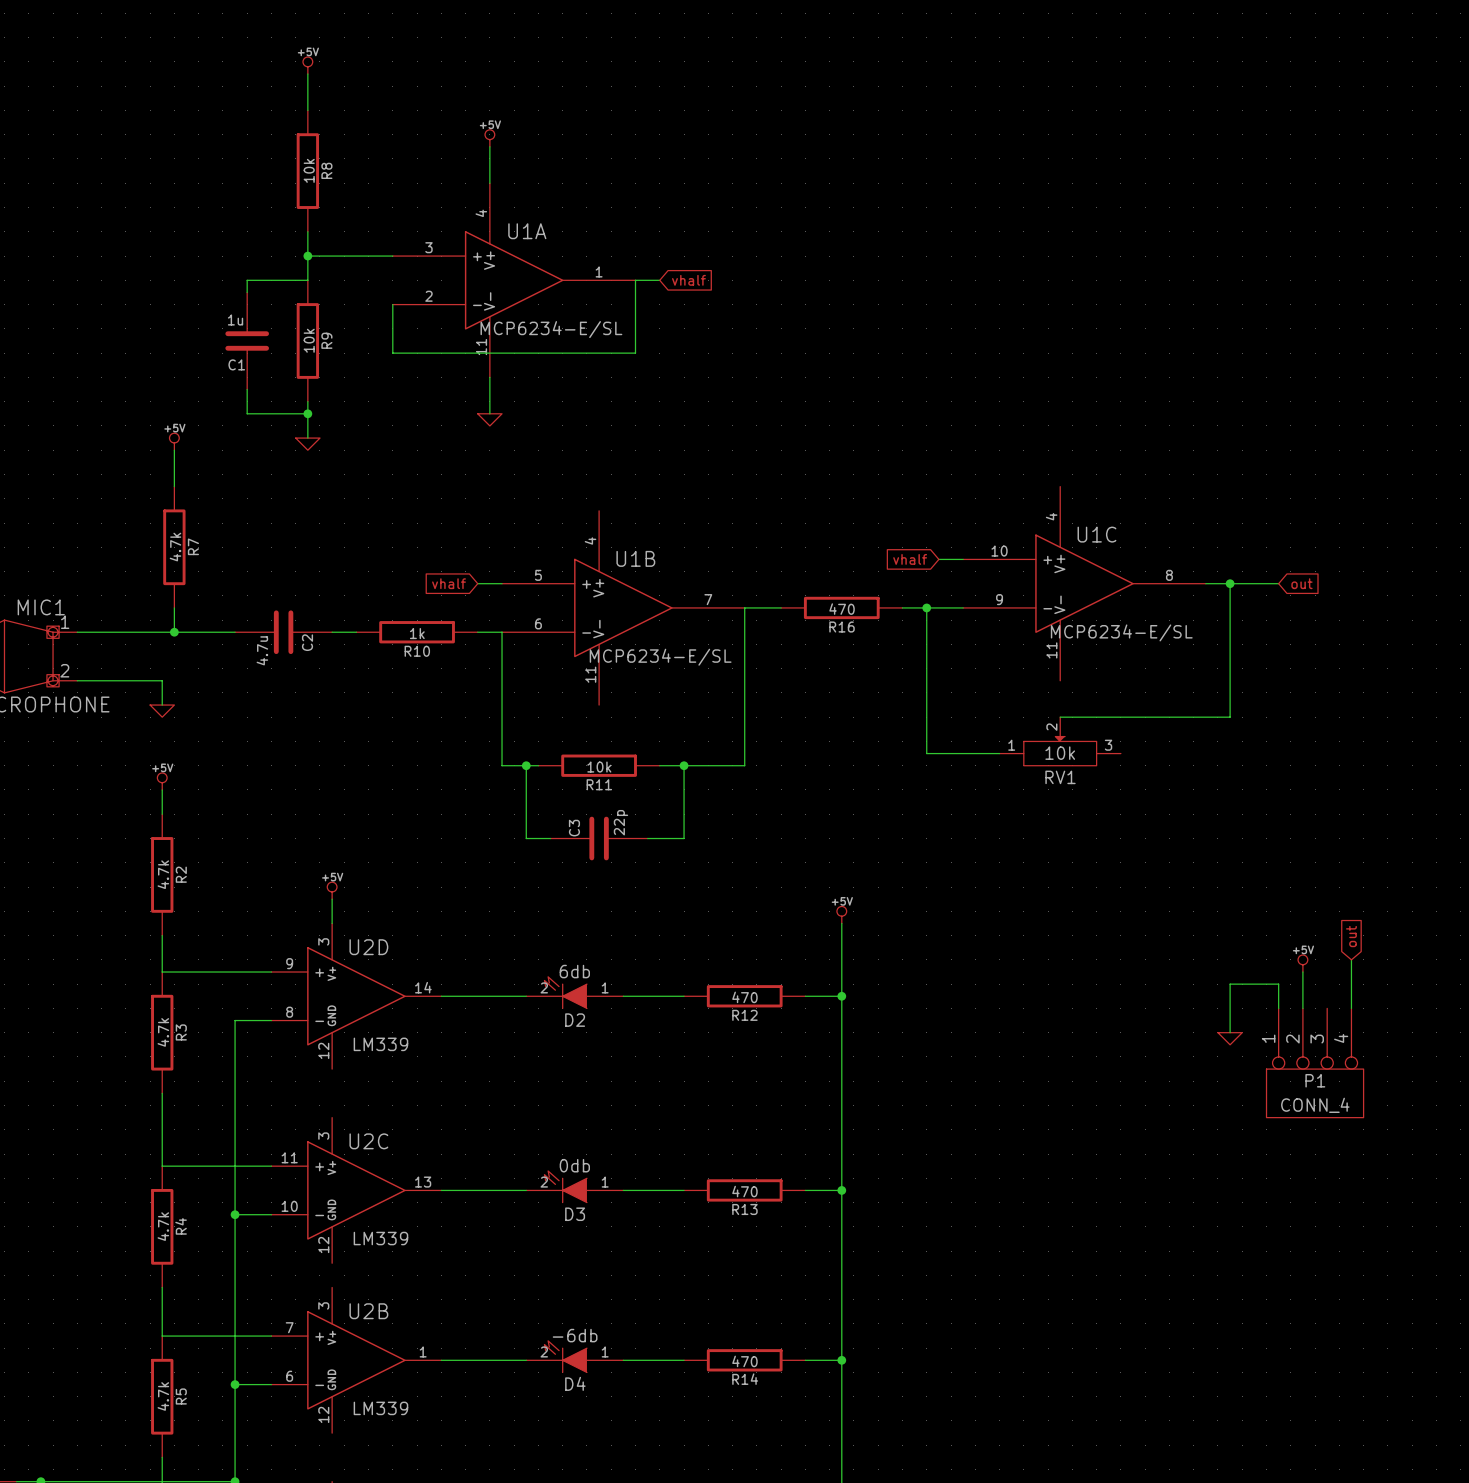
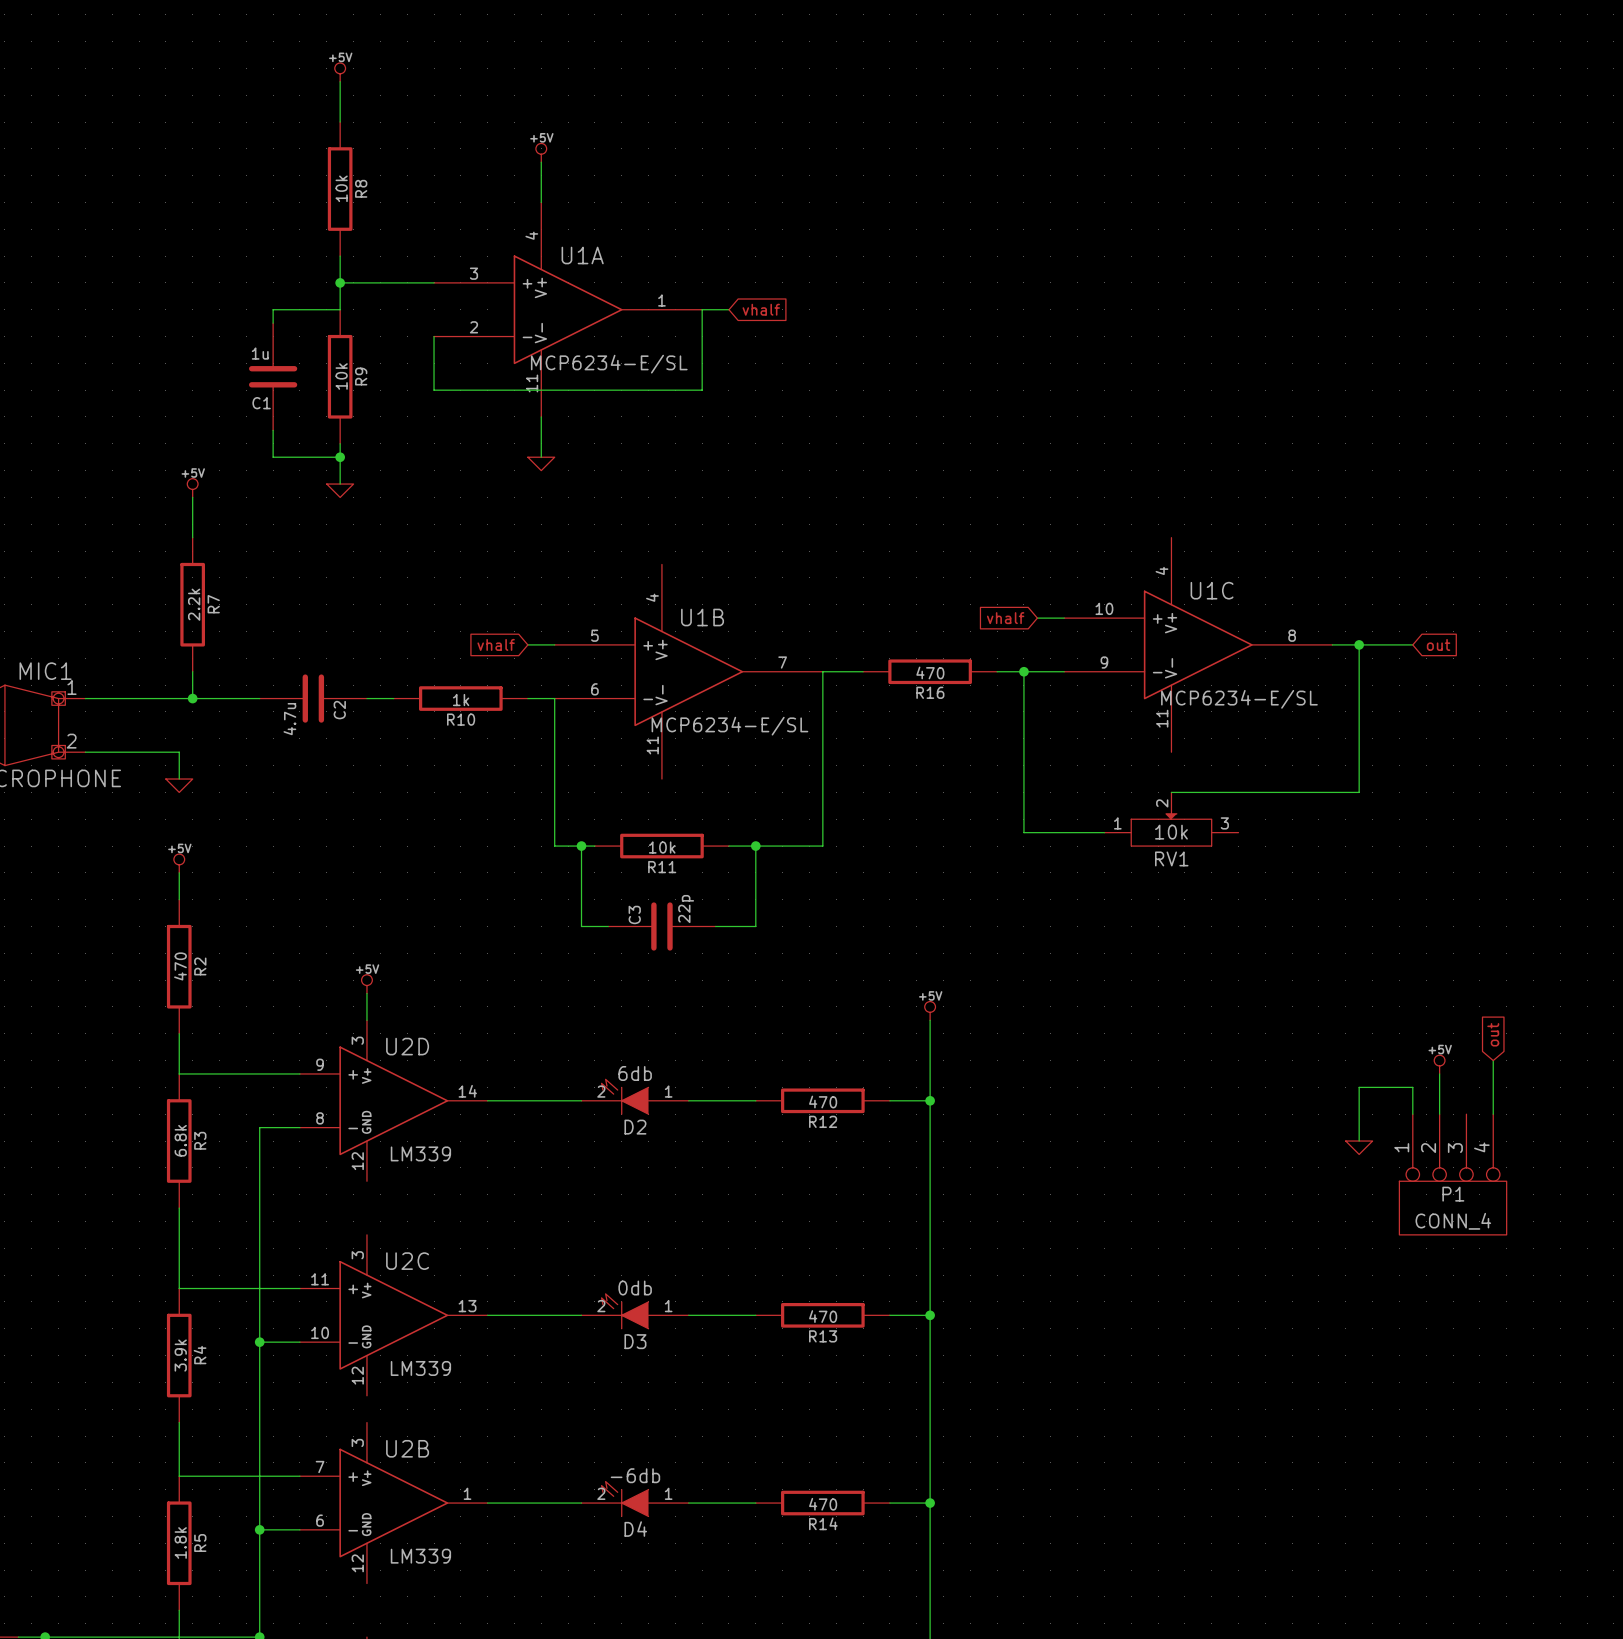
R7 value: 4.7k (175, 547) -> 2.2k (194, 604)
R2 value: 4.7k (163, 874) -> 470 (180, 966)
R3 value: 4.7k (163, 1032) -> 6.8k (180, 1140)
R4 value: 4.7k (163, 1226) -> 3.9k (180, 1355)
R5 value: 4.7k (163, 1396) -> 1.8k (180, 1543)

